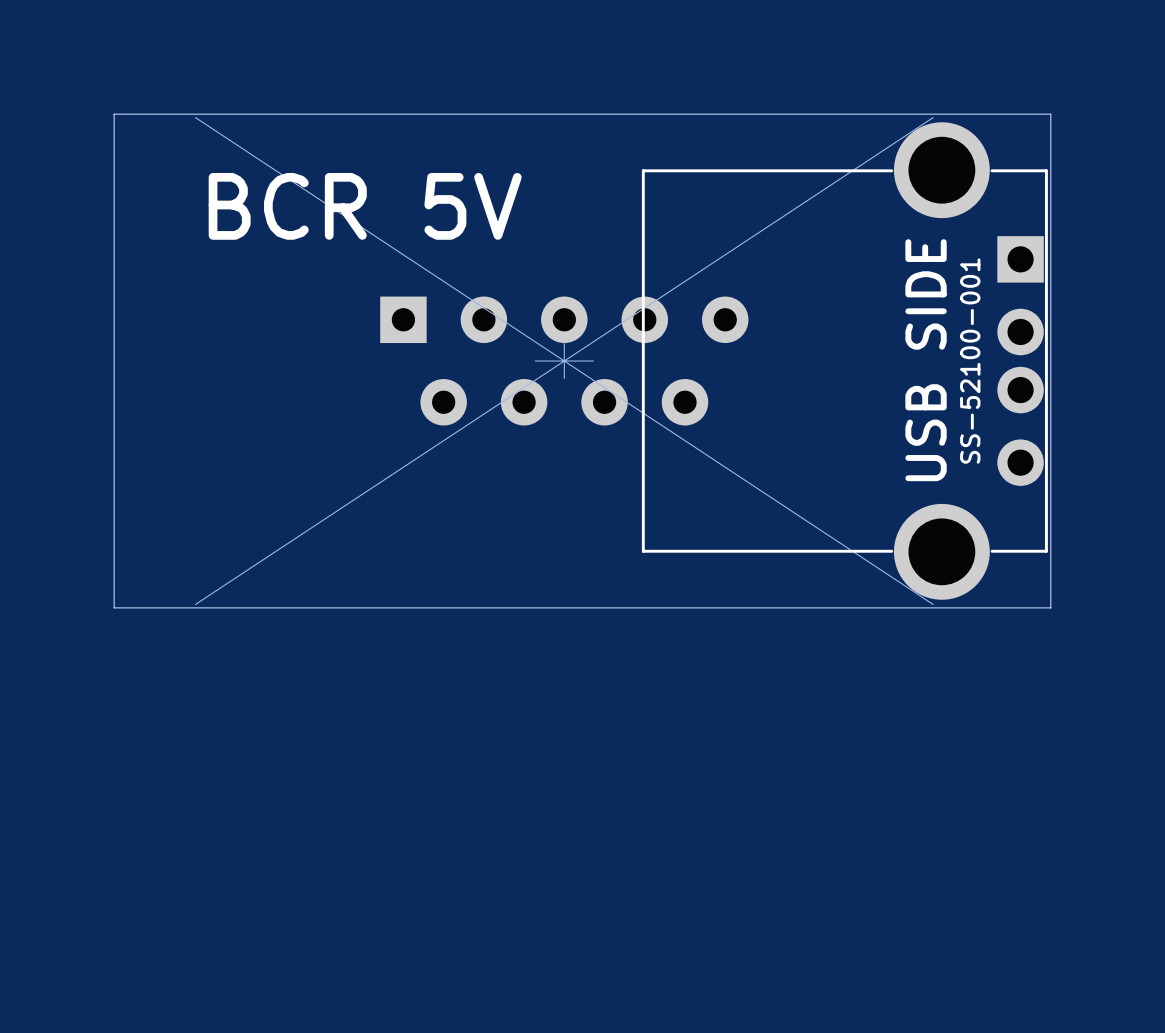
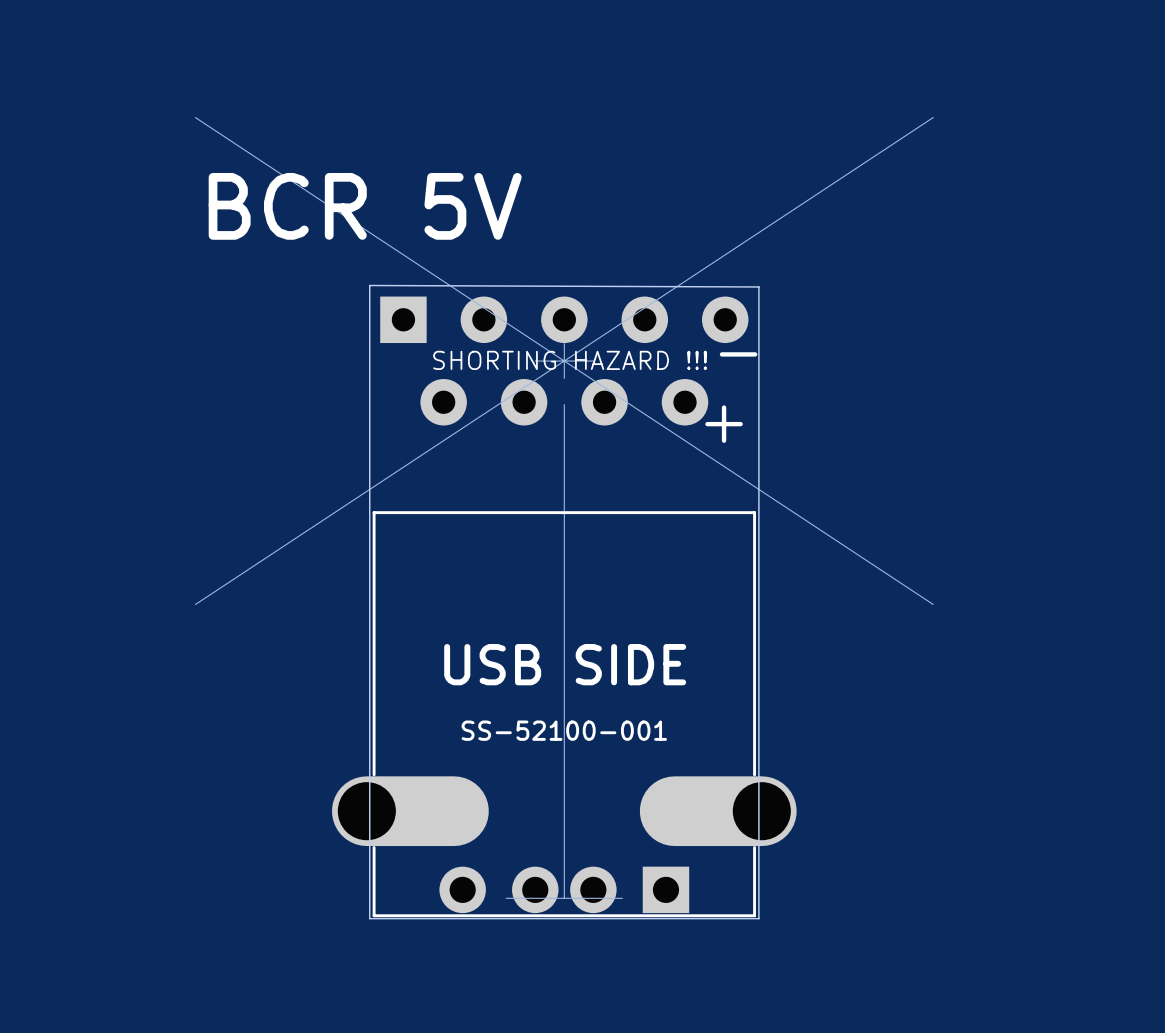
board edge: (114, 114) (114, 607) (1050, 607) (1050, 114) (114, 114) -> none
board edge: none -> (369, 285) (369, 918) (758, 918) (758, 286) (369, 285)
text: none -> - (738, 354)
text: none -> SHORTING HAZARD !!! (570, 360)
text rotation: 0° (926, 360) -> 90° clockwise (565, 664)
text position: USB SIDE (926, 360) -> USB SIDE (565, 664)
part: (844, 361) -> none
text rotation: 0° (970, 361) -> 90° clockwise (564, 730)
text position: SS-52100-001 (970, 361) -> SS-52100-001 (564, 730)
line: none -> (564, 404) (564, 898)
text: none -> + (724, 424)
part: none -> (564, 714)
line: none -> (506, 898) (622, 898)

